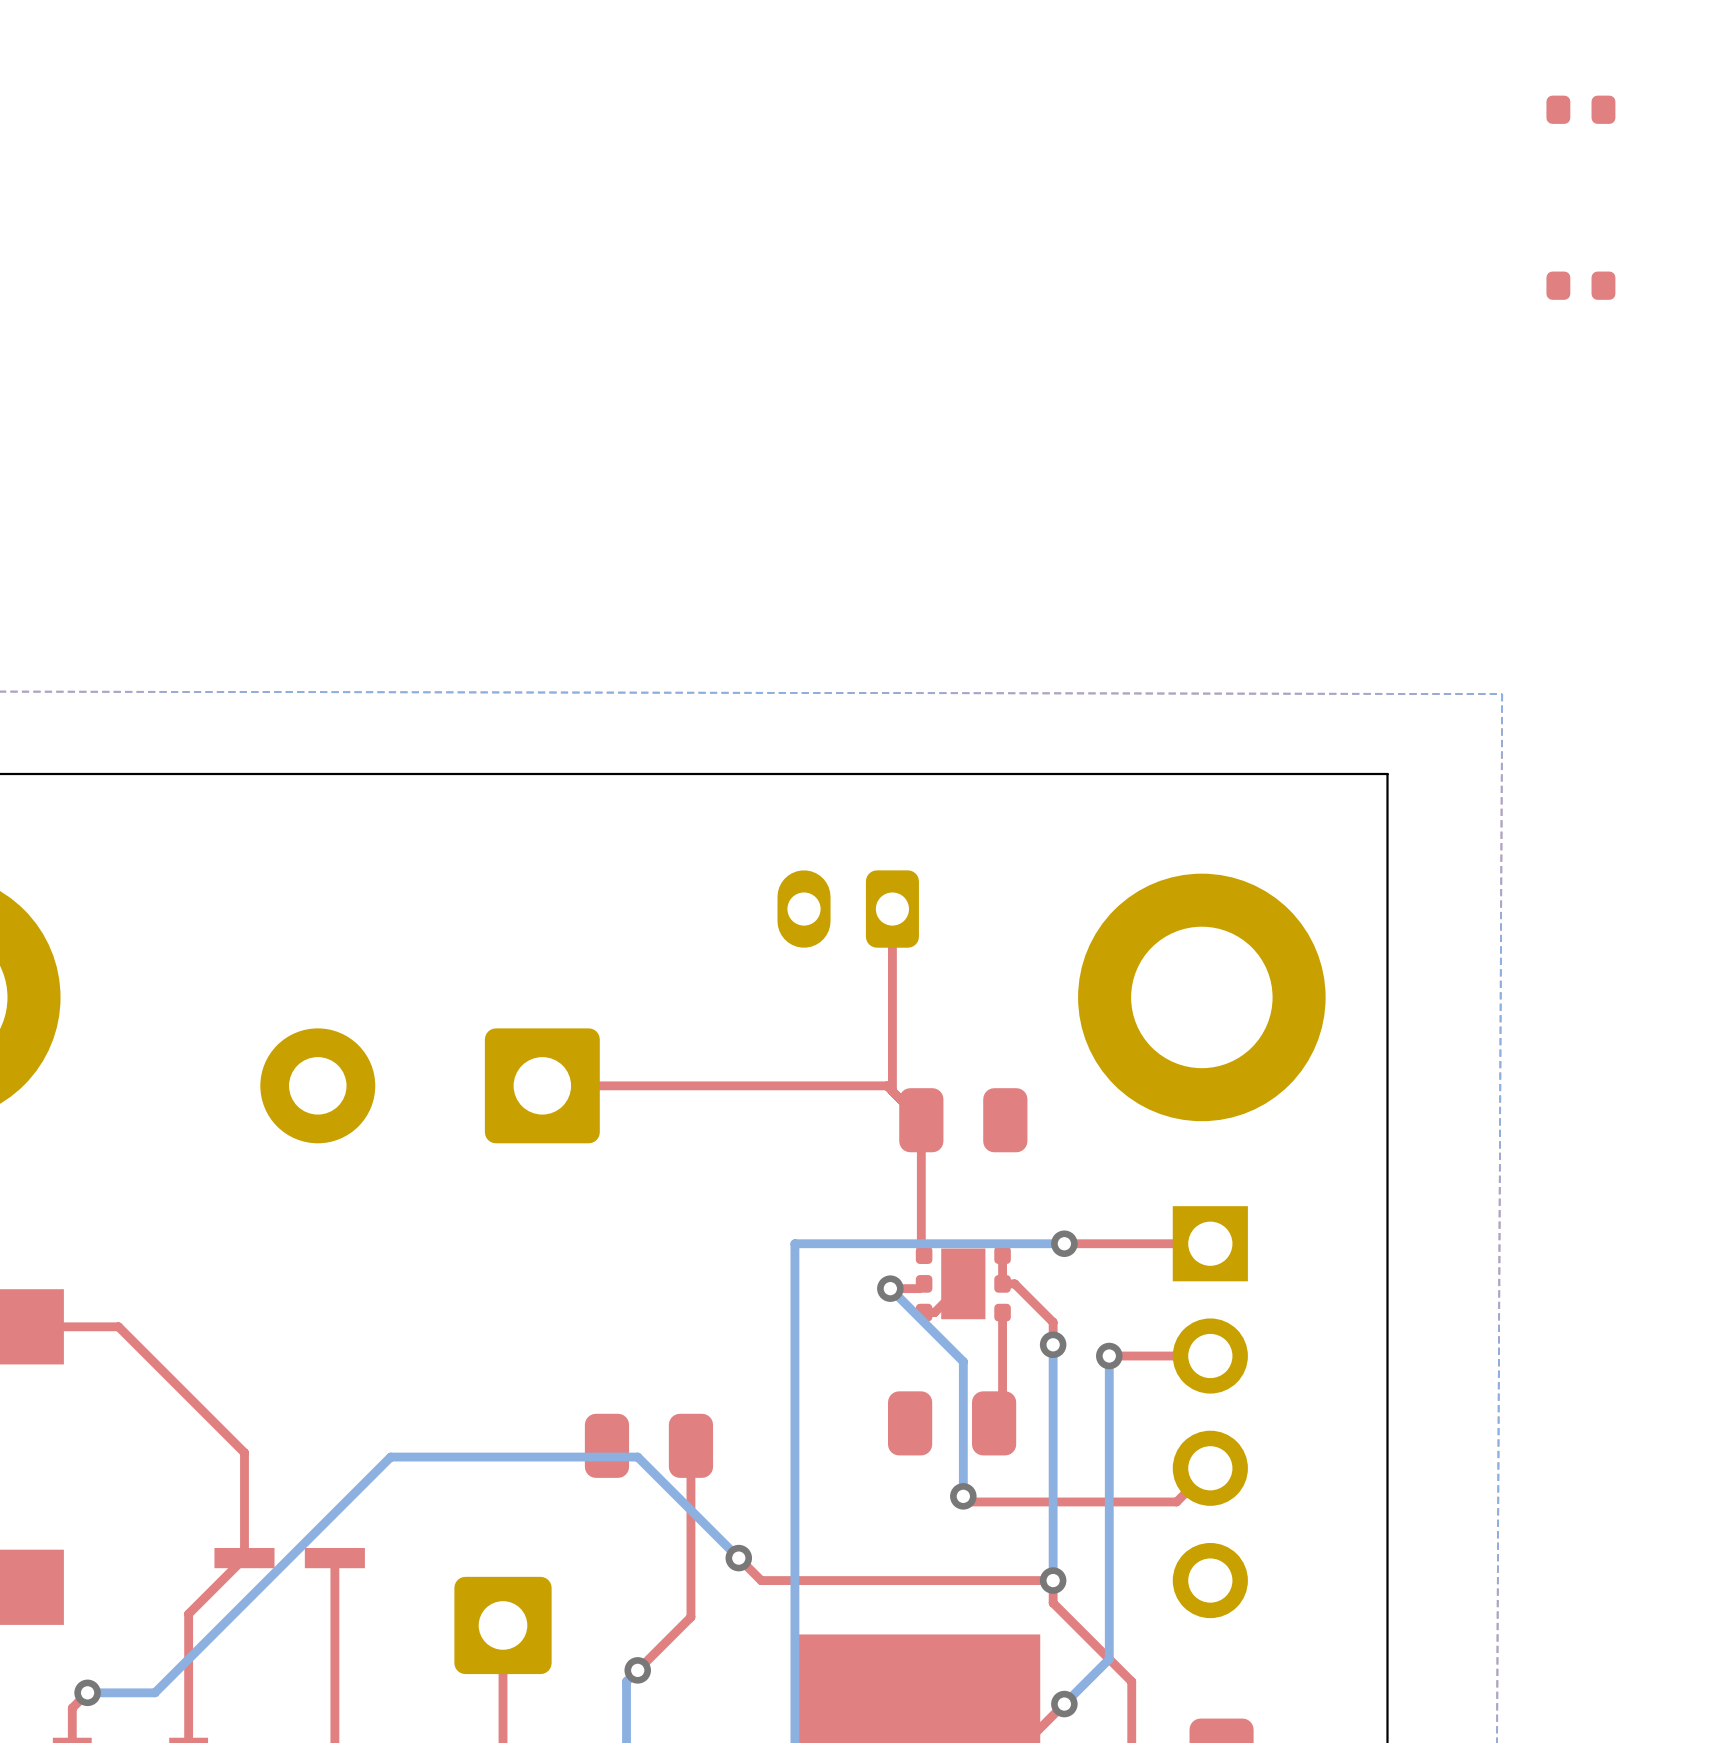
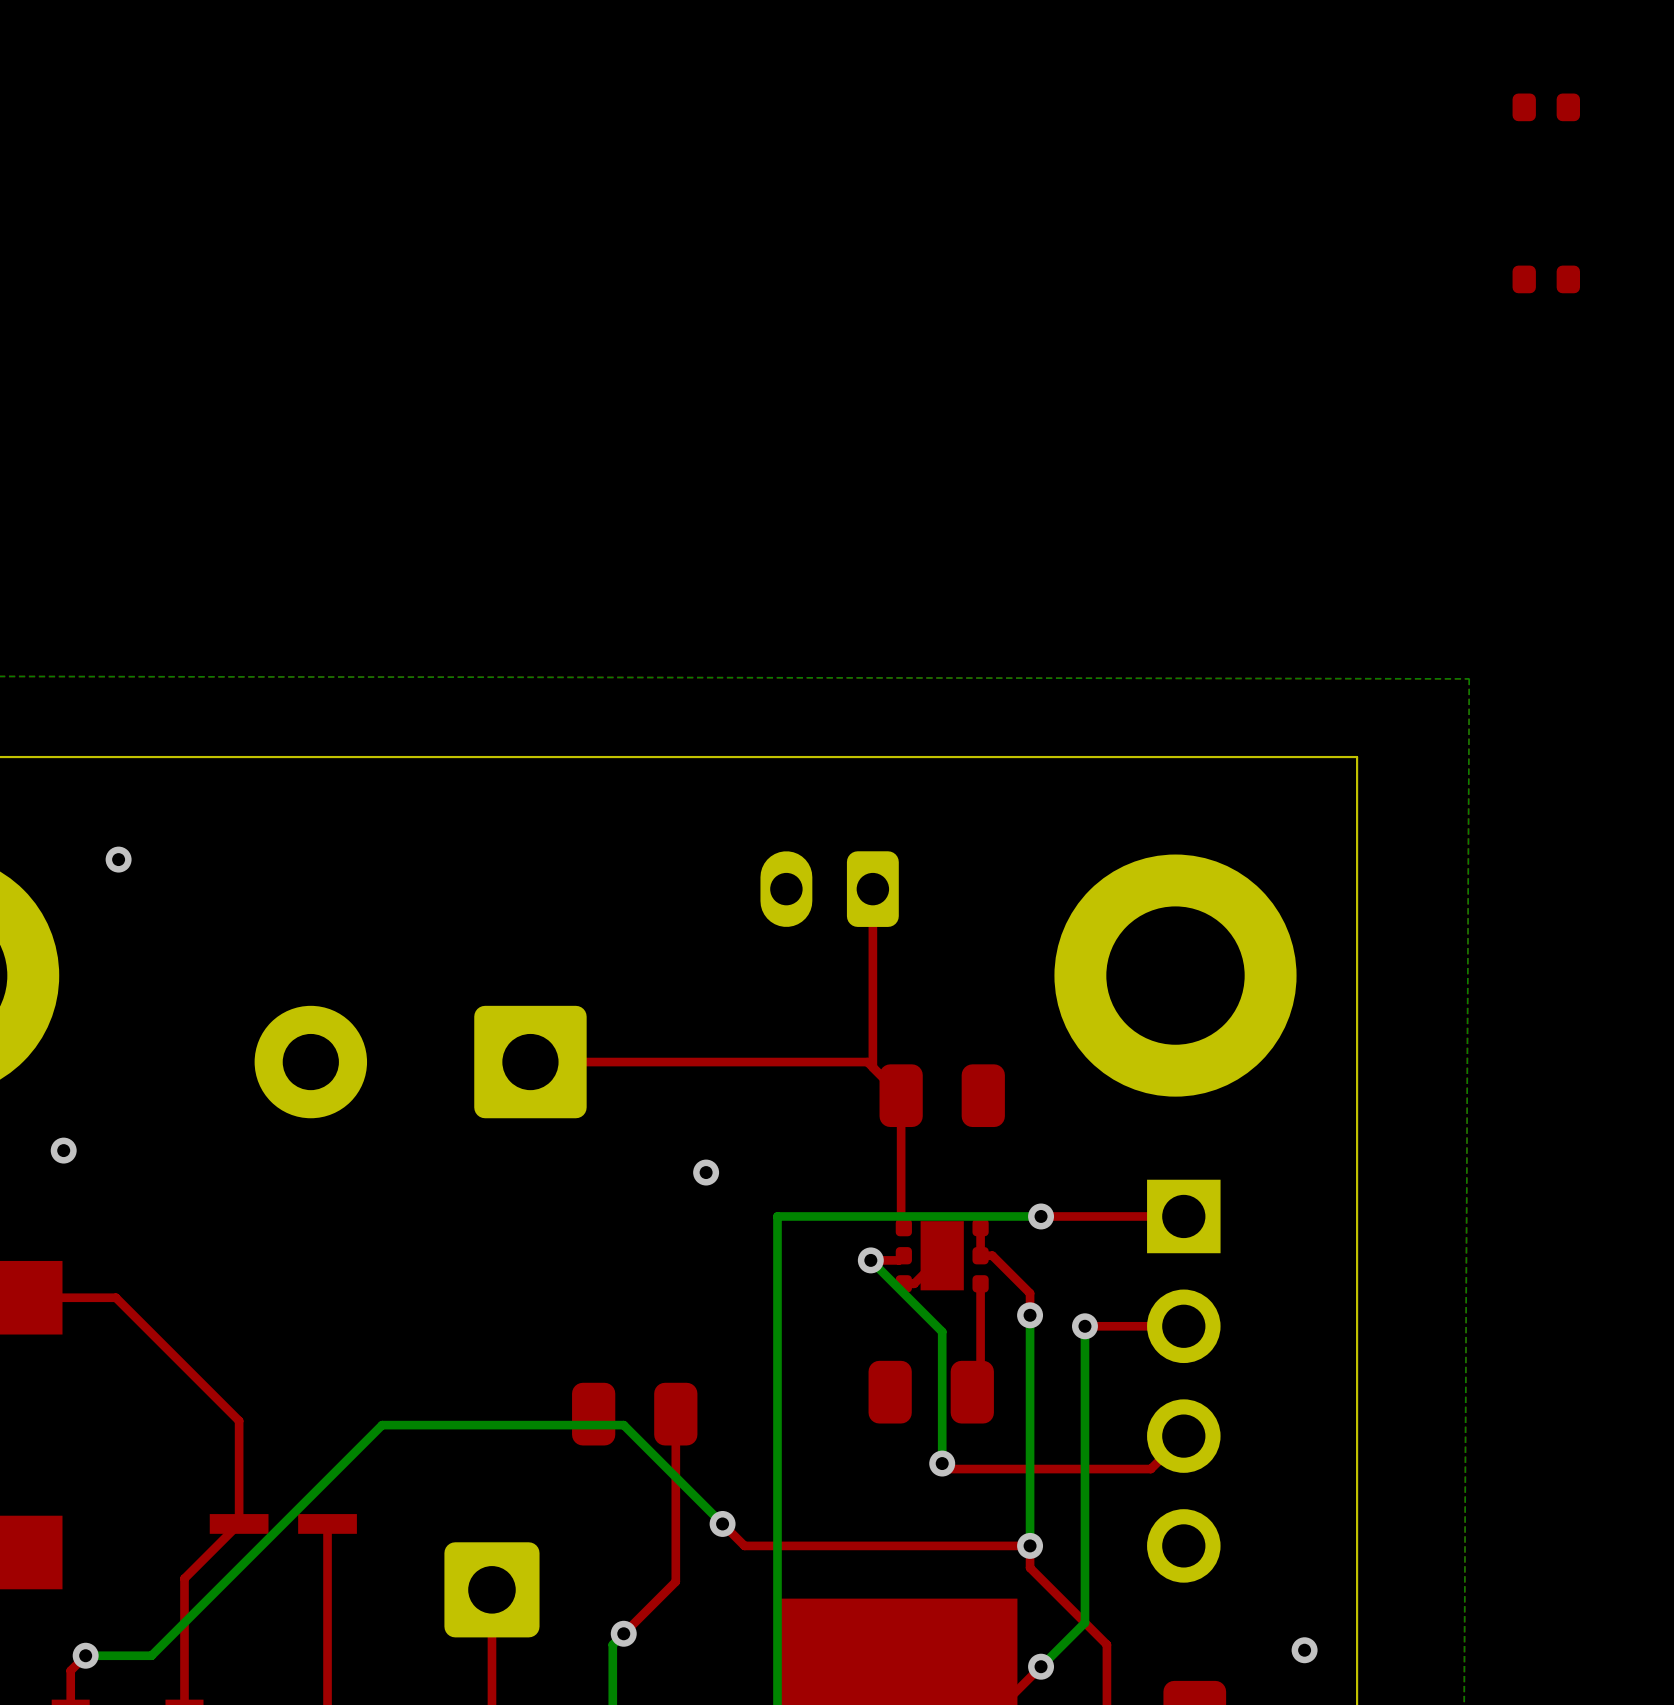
via: none -> (118, 859)
via: none -> (63, 1150)
via: none -> (706, 1172)
via: none -> (1304, 1650)

